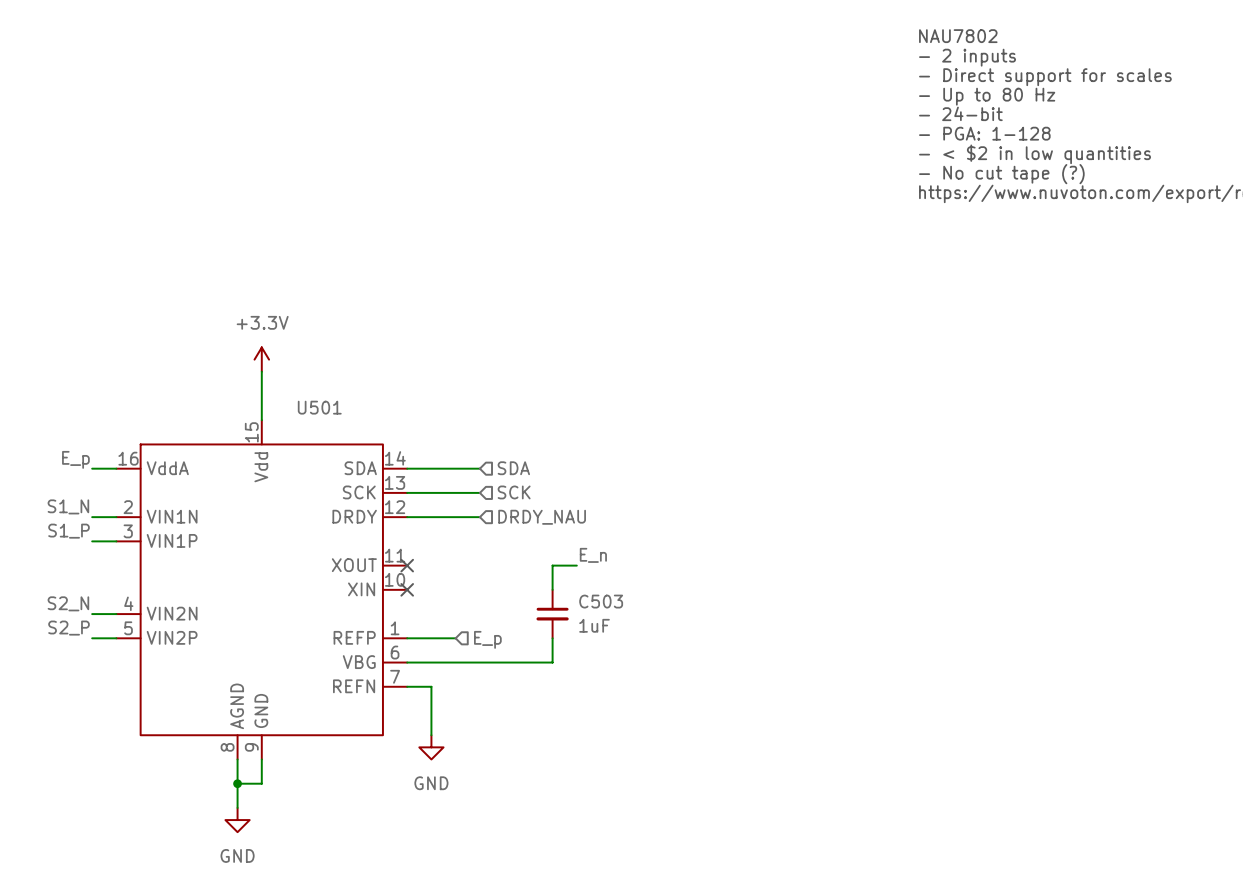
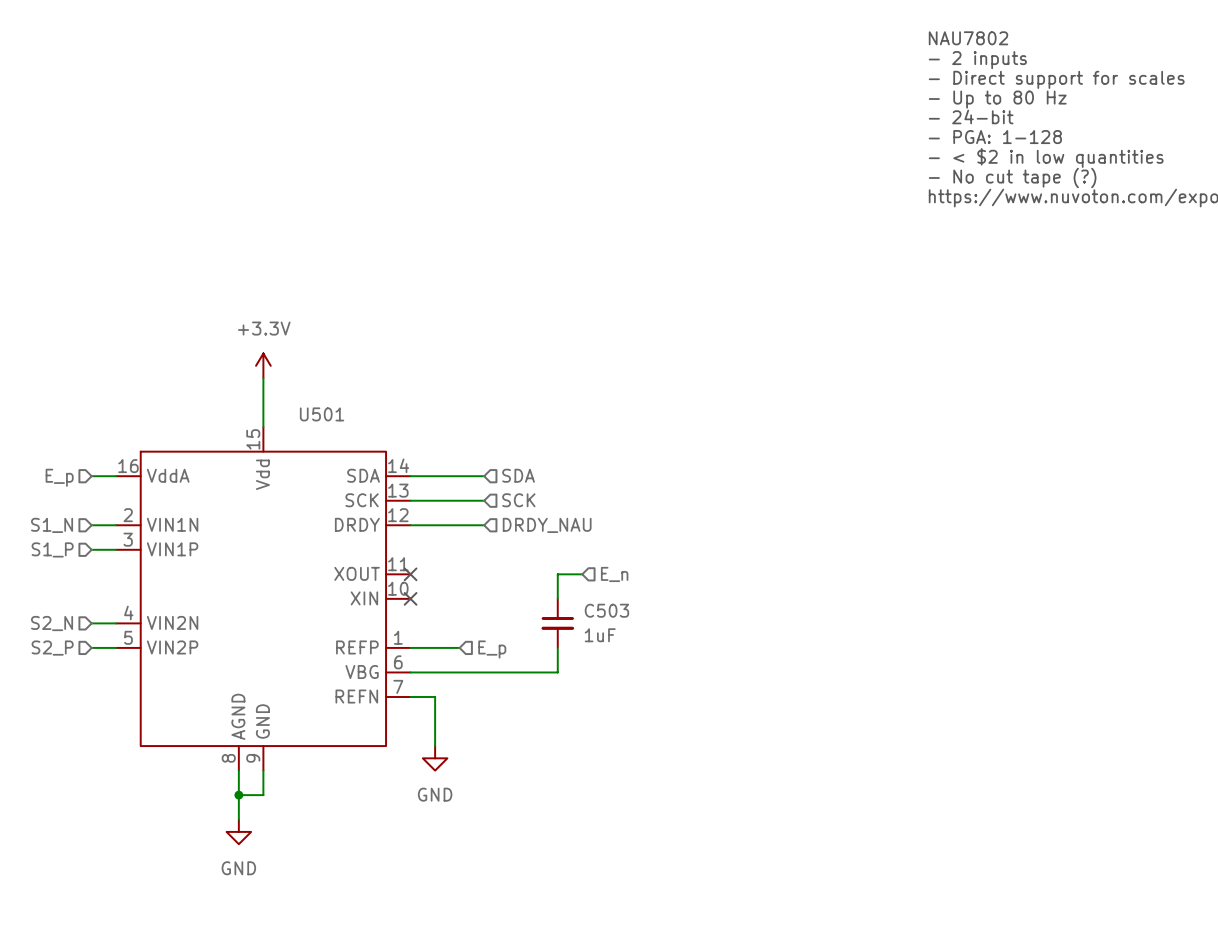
label: E_p (75, 459) -> none
hierarchical label: none -> E_p (59, 477)
label: S1_N (68, 506) -> none
hierarchical label: none -> S1_N (52, 525)
label: S1_P (69, 531) -> none
hierarchical label: none -> S1_P (52, 549)
label: E_n (593, 555) -> none
hierarchical label: none -> E_n (614, 574)
label: S2_N (68, 603) -> none
hierarchical label: none -> S2_N (52, 623)
label: S2_P (69, 628) -> none
hierarchical label: none -> S2_P (52, 648)

